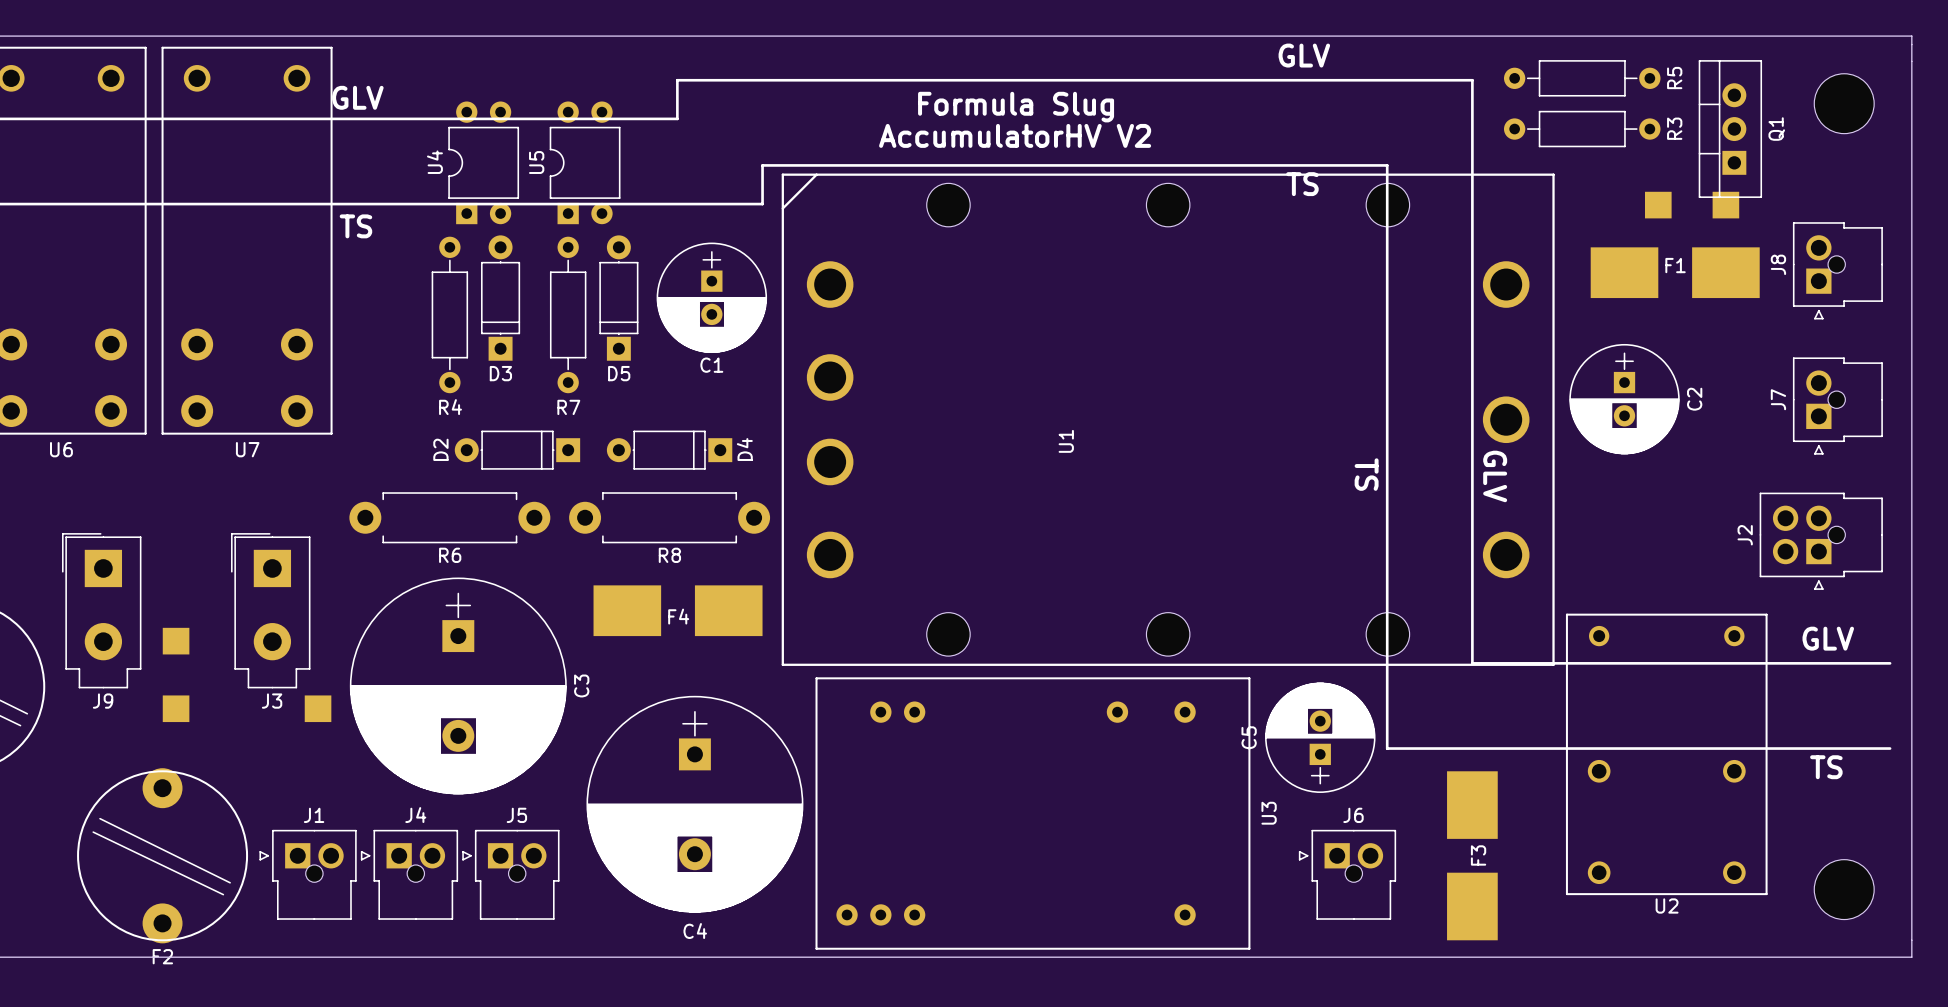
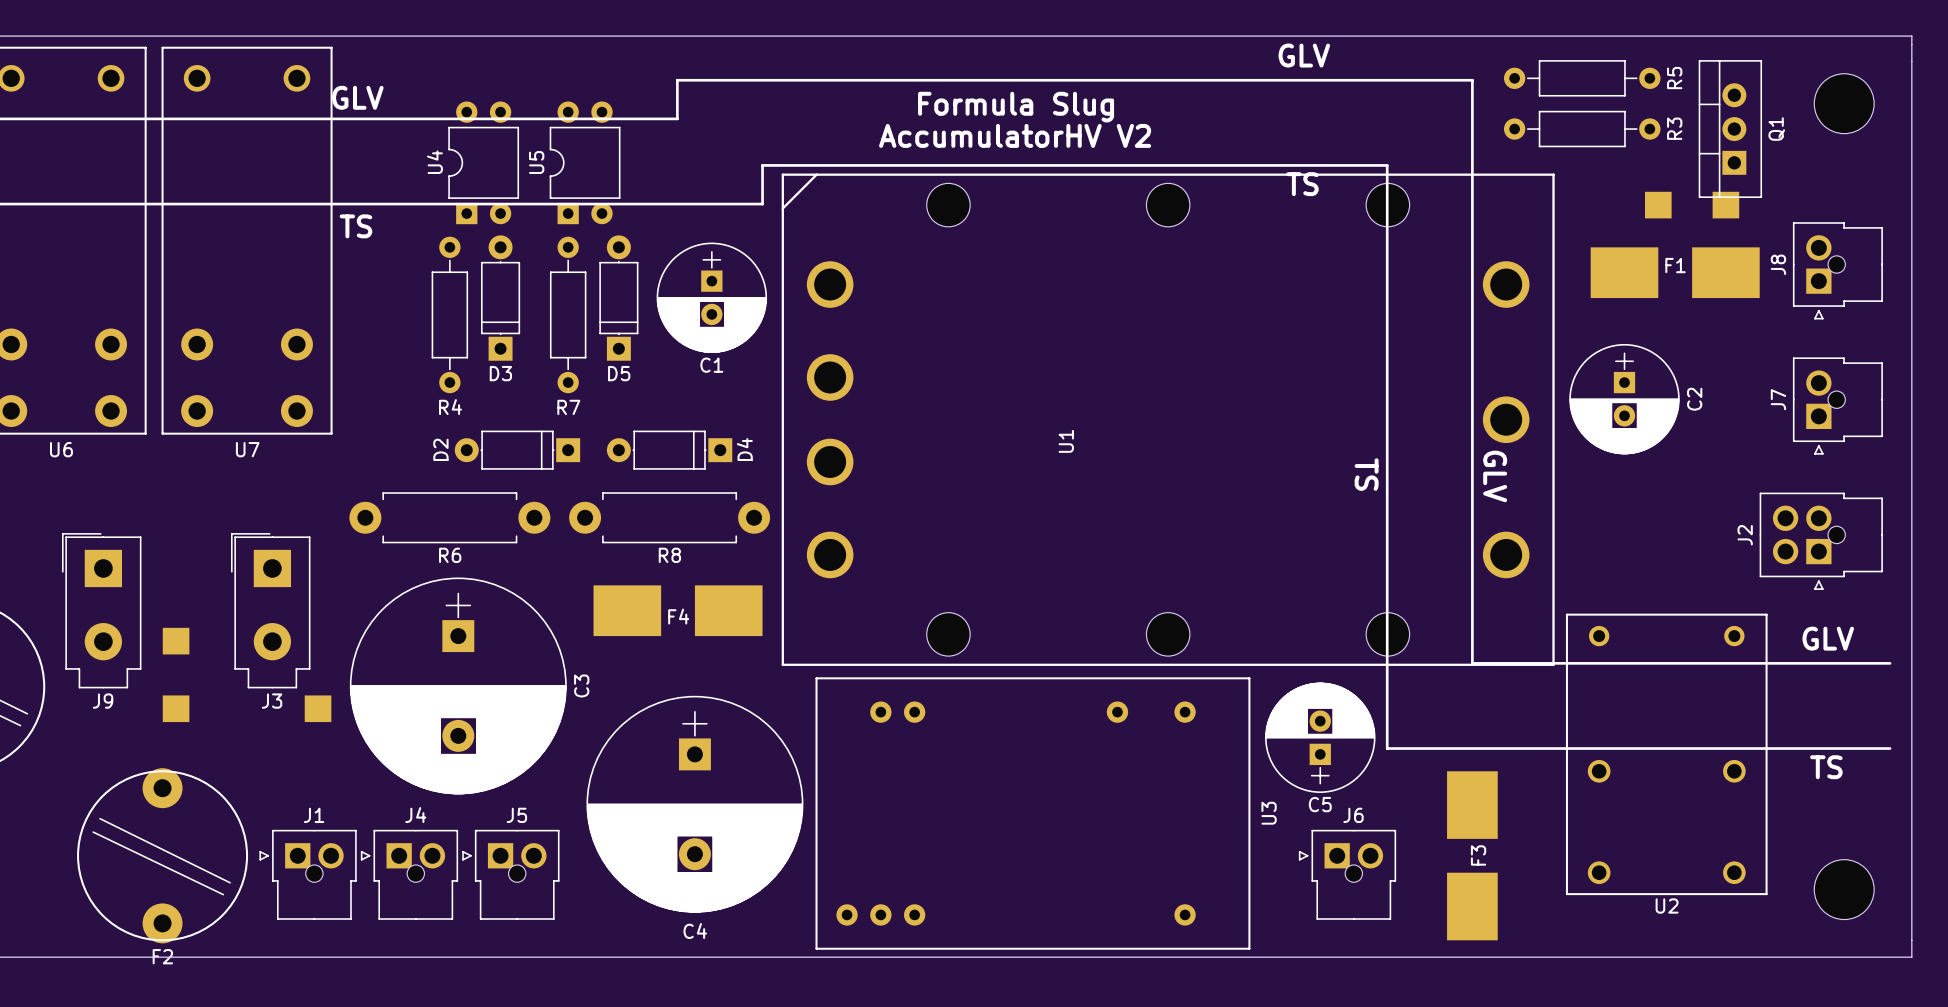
C5 name rotation: 0° (1249, 737) -> 90° clockwise (1320, 804)
C5 name position: C5 (1249, 737) -> C5 (1320, 804)

